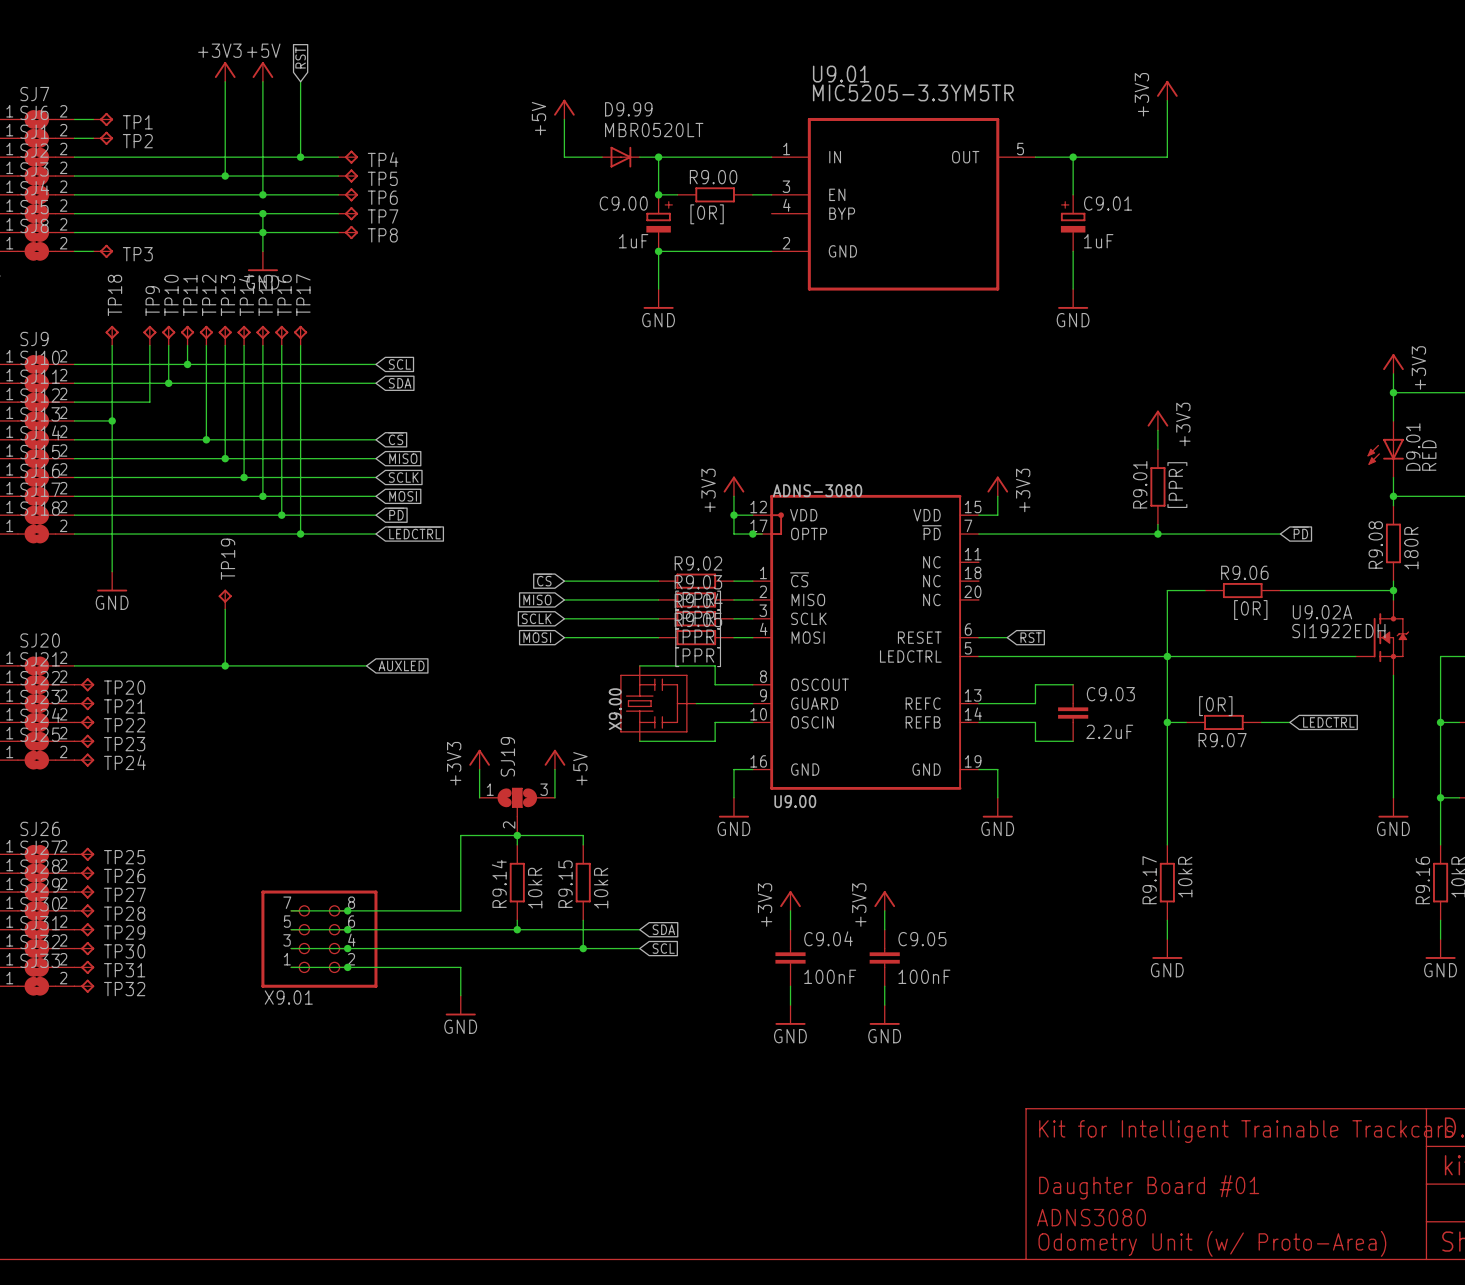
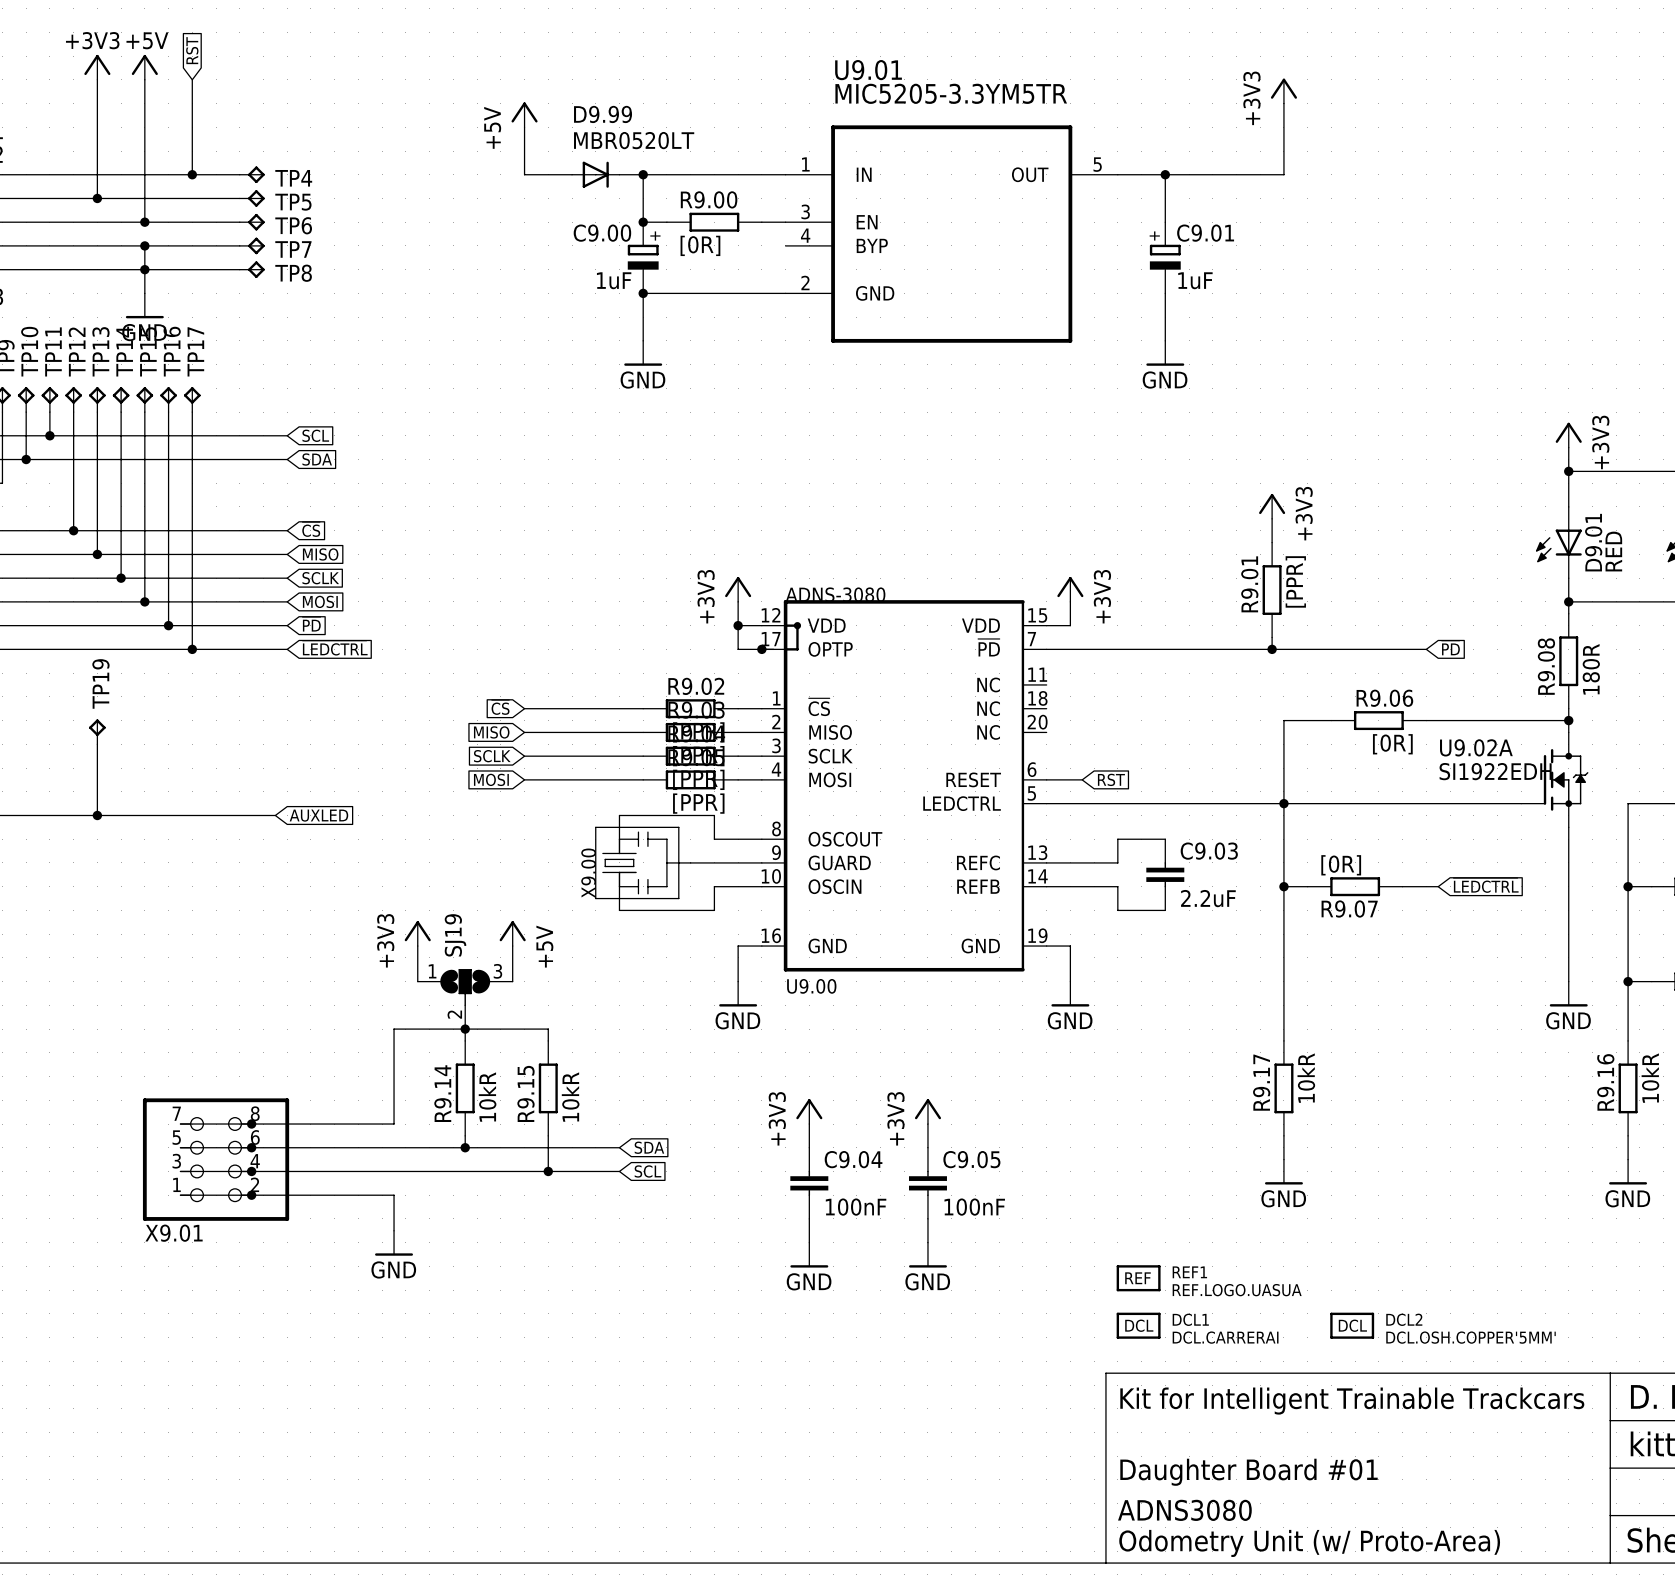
REF1: none -> REF.LOGO.UASUA (1138, 1278)
DCL1: none -> DCL.CARRERAI (1138, 1325)
DCL2: none -> DCL.OSH.COPPER'5MM' (1352, 1325)

